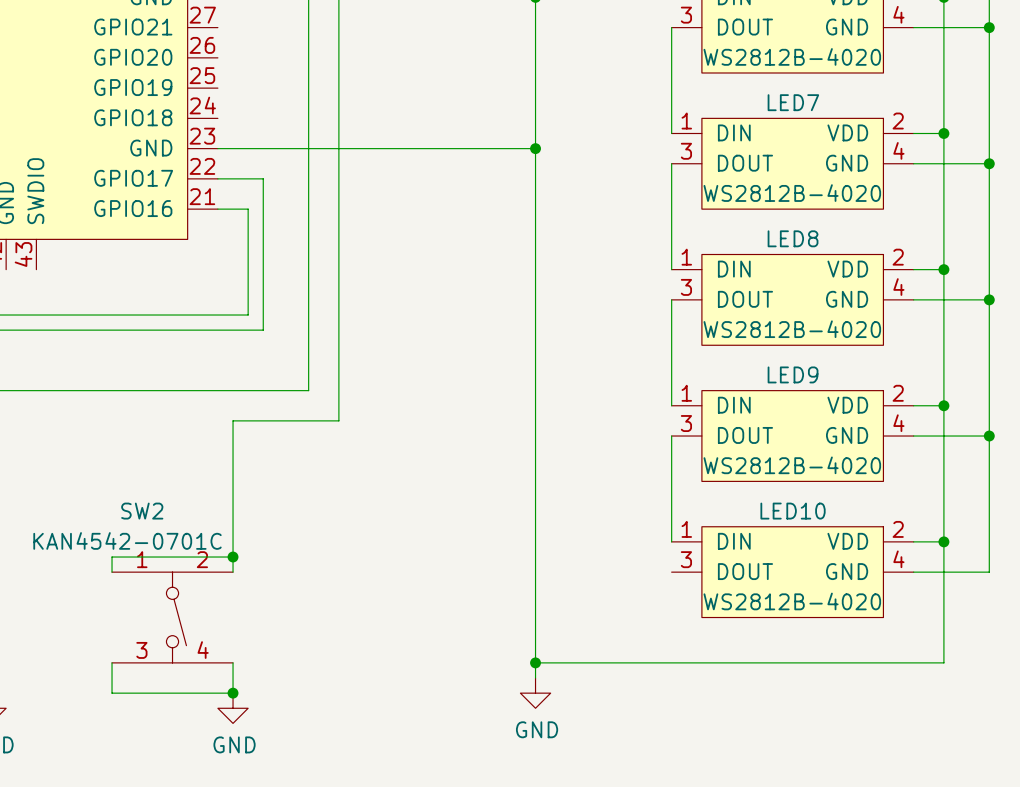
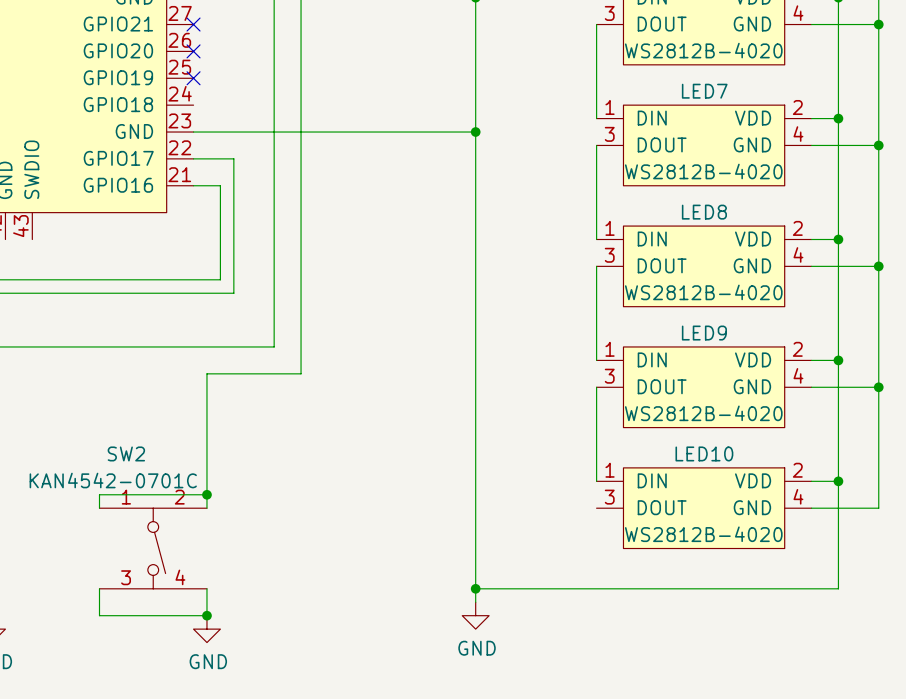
no-connect mark: none -> (193, 24)
no-connect mark: none -> (193, 51)
no-connect mark: none -> (193, 78)

